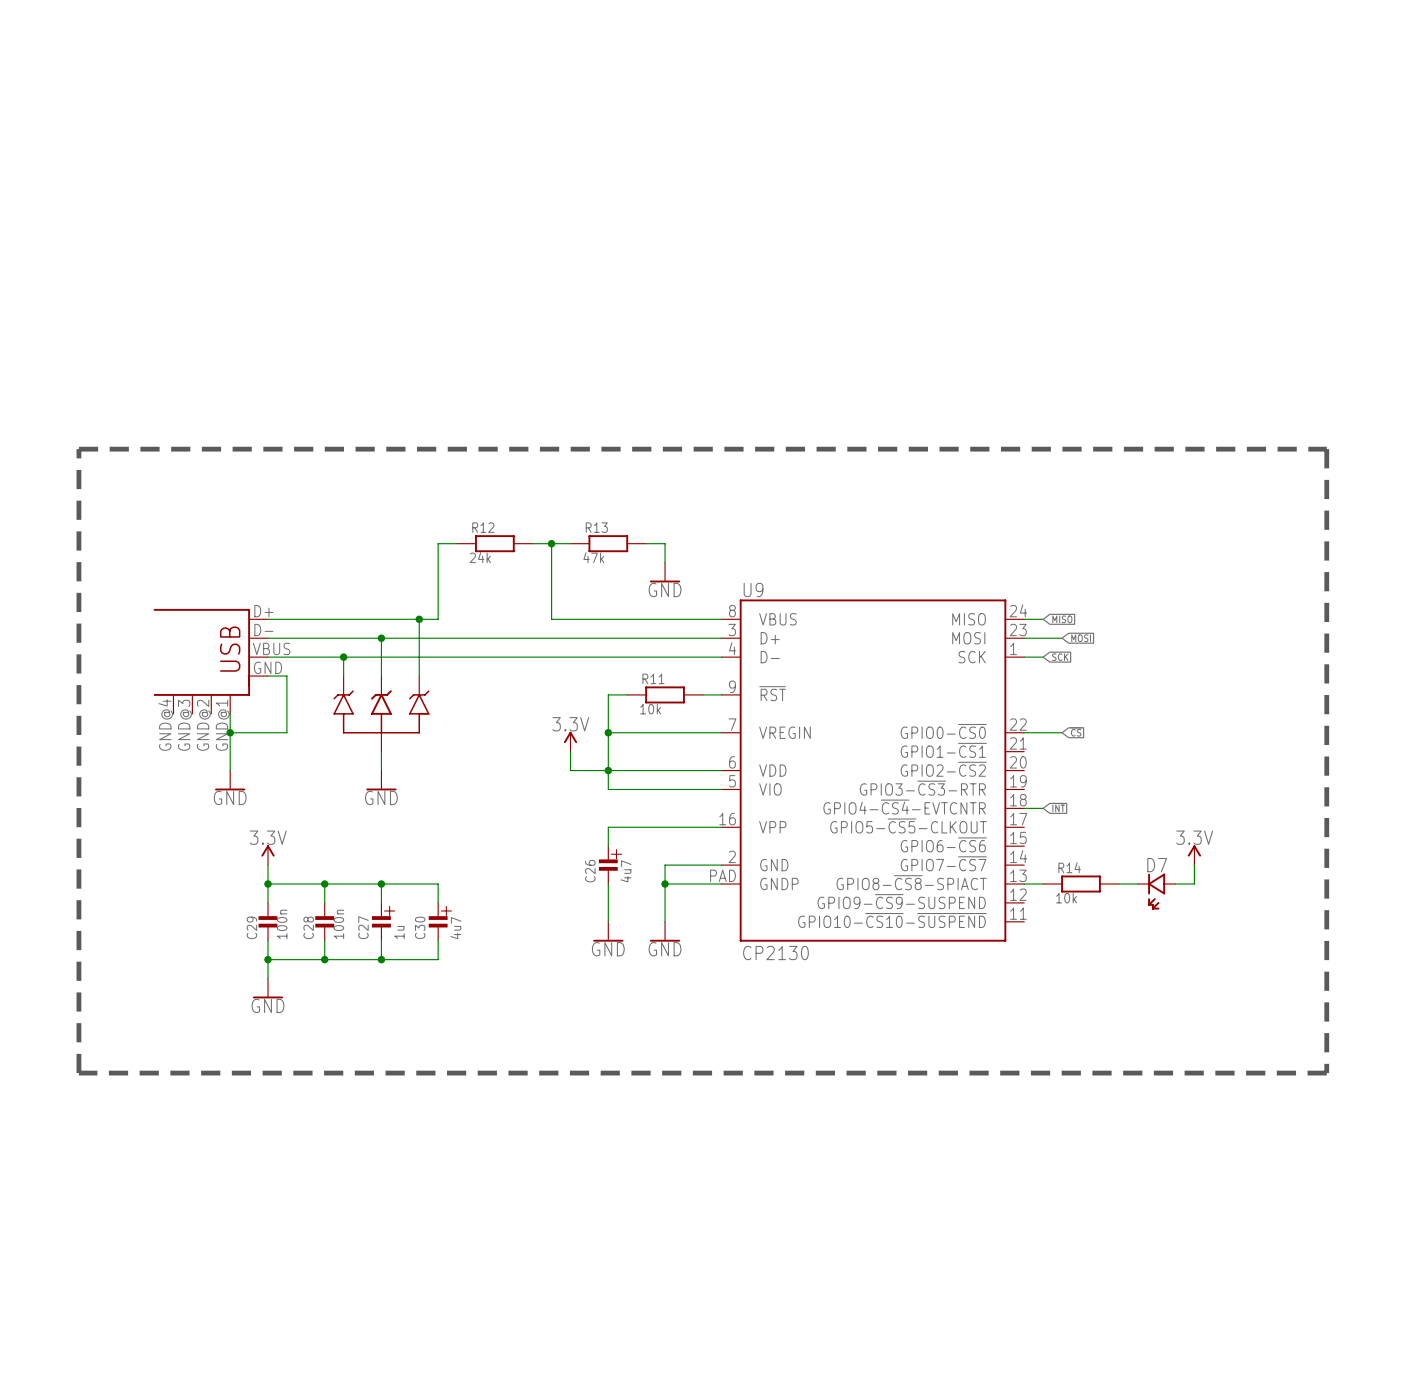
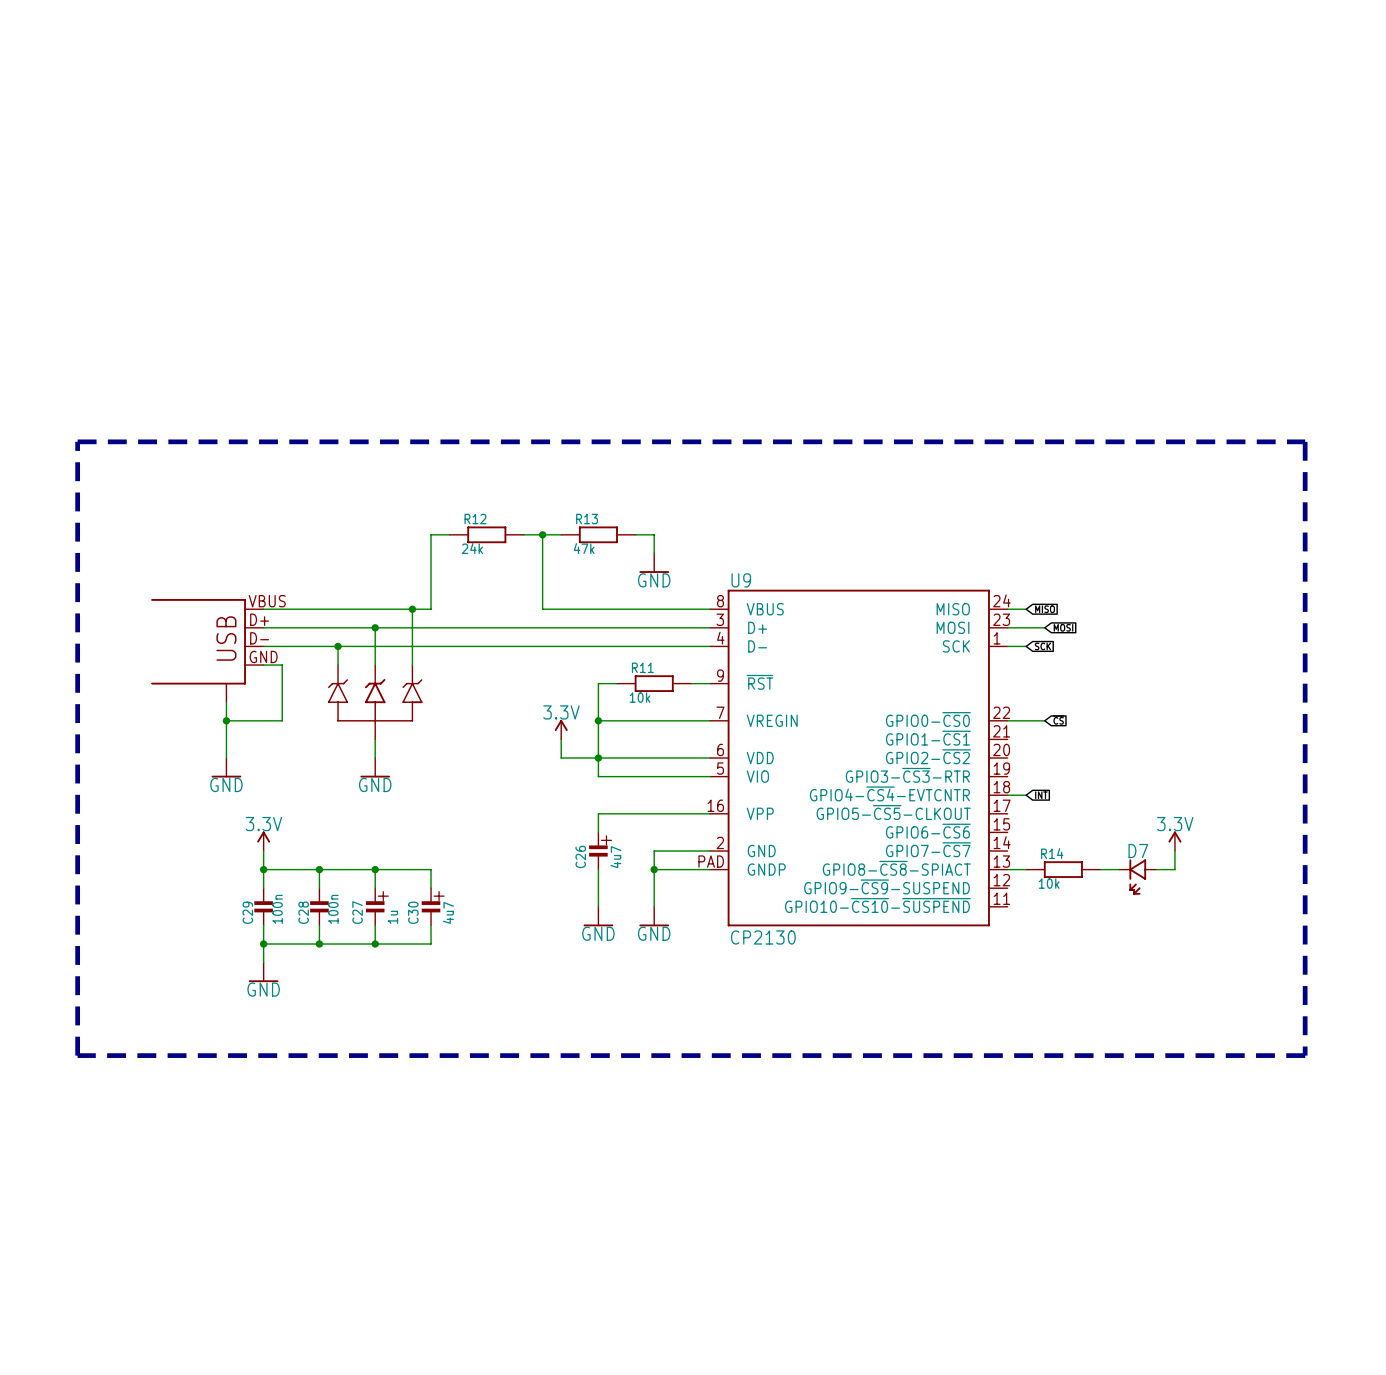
part symbol: [153, 608, 268, 714] -> [151, 599, 264, 703]

